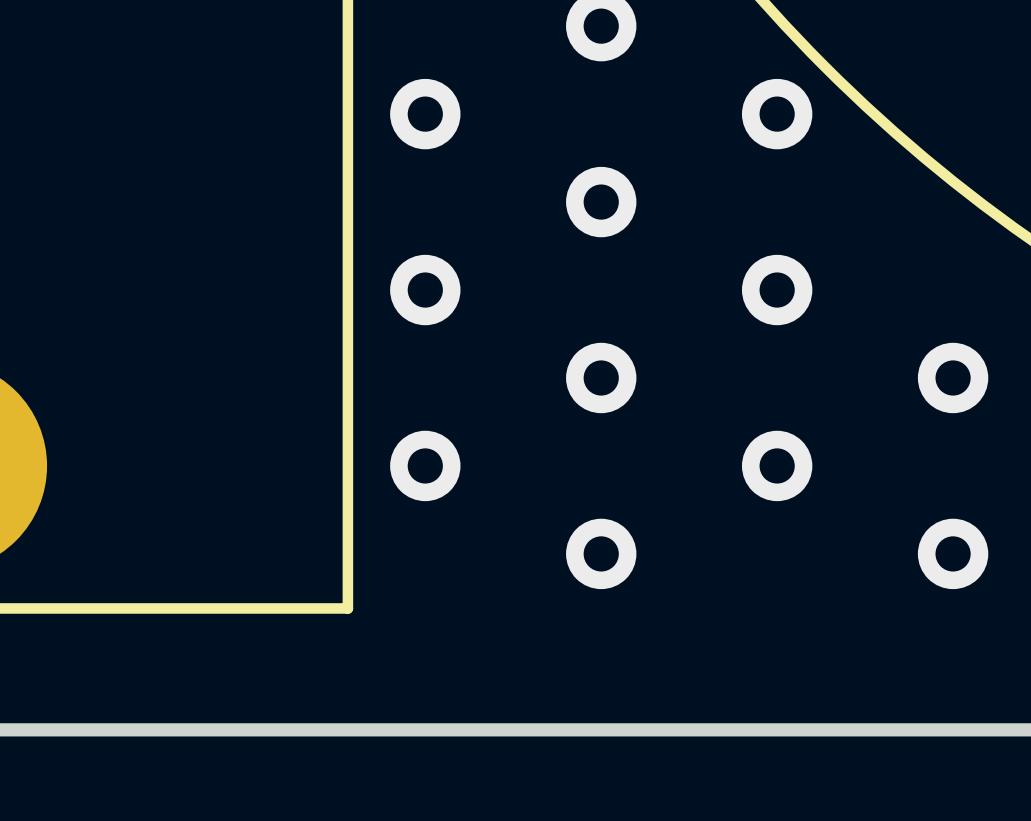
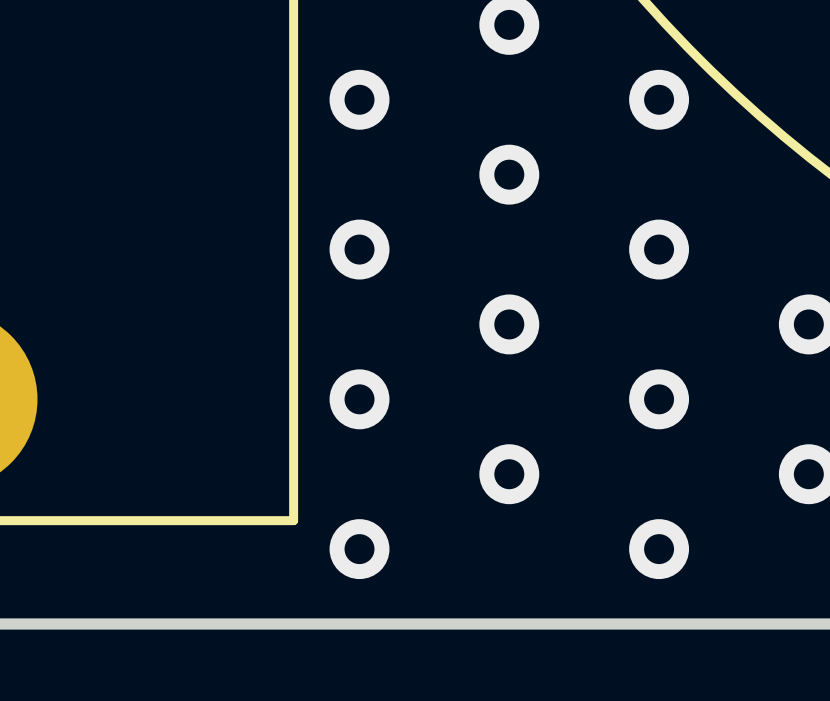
via: none -> (359, 549)
via: none -> (659, 549)

